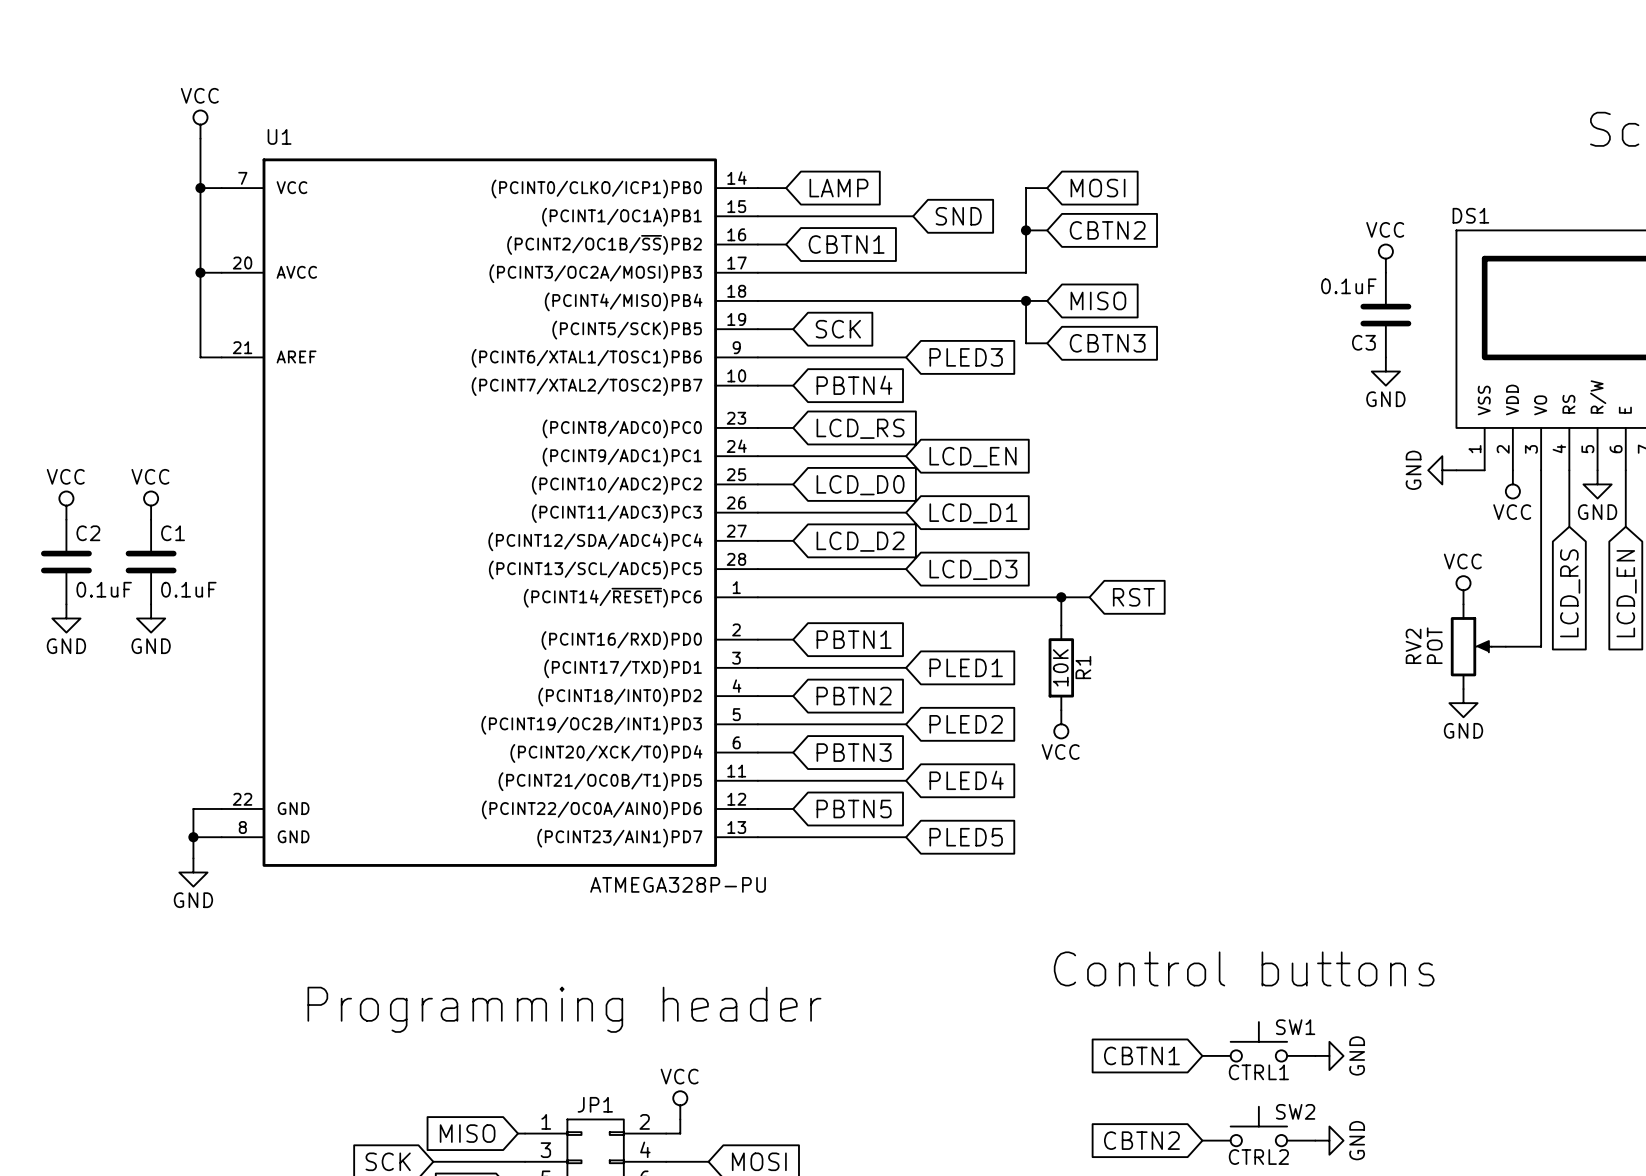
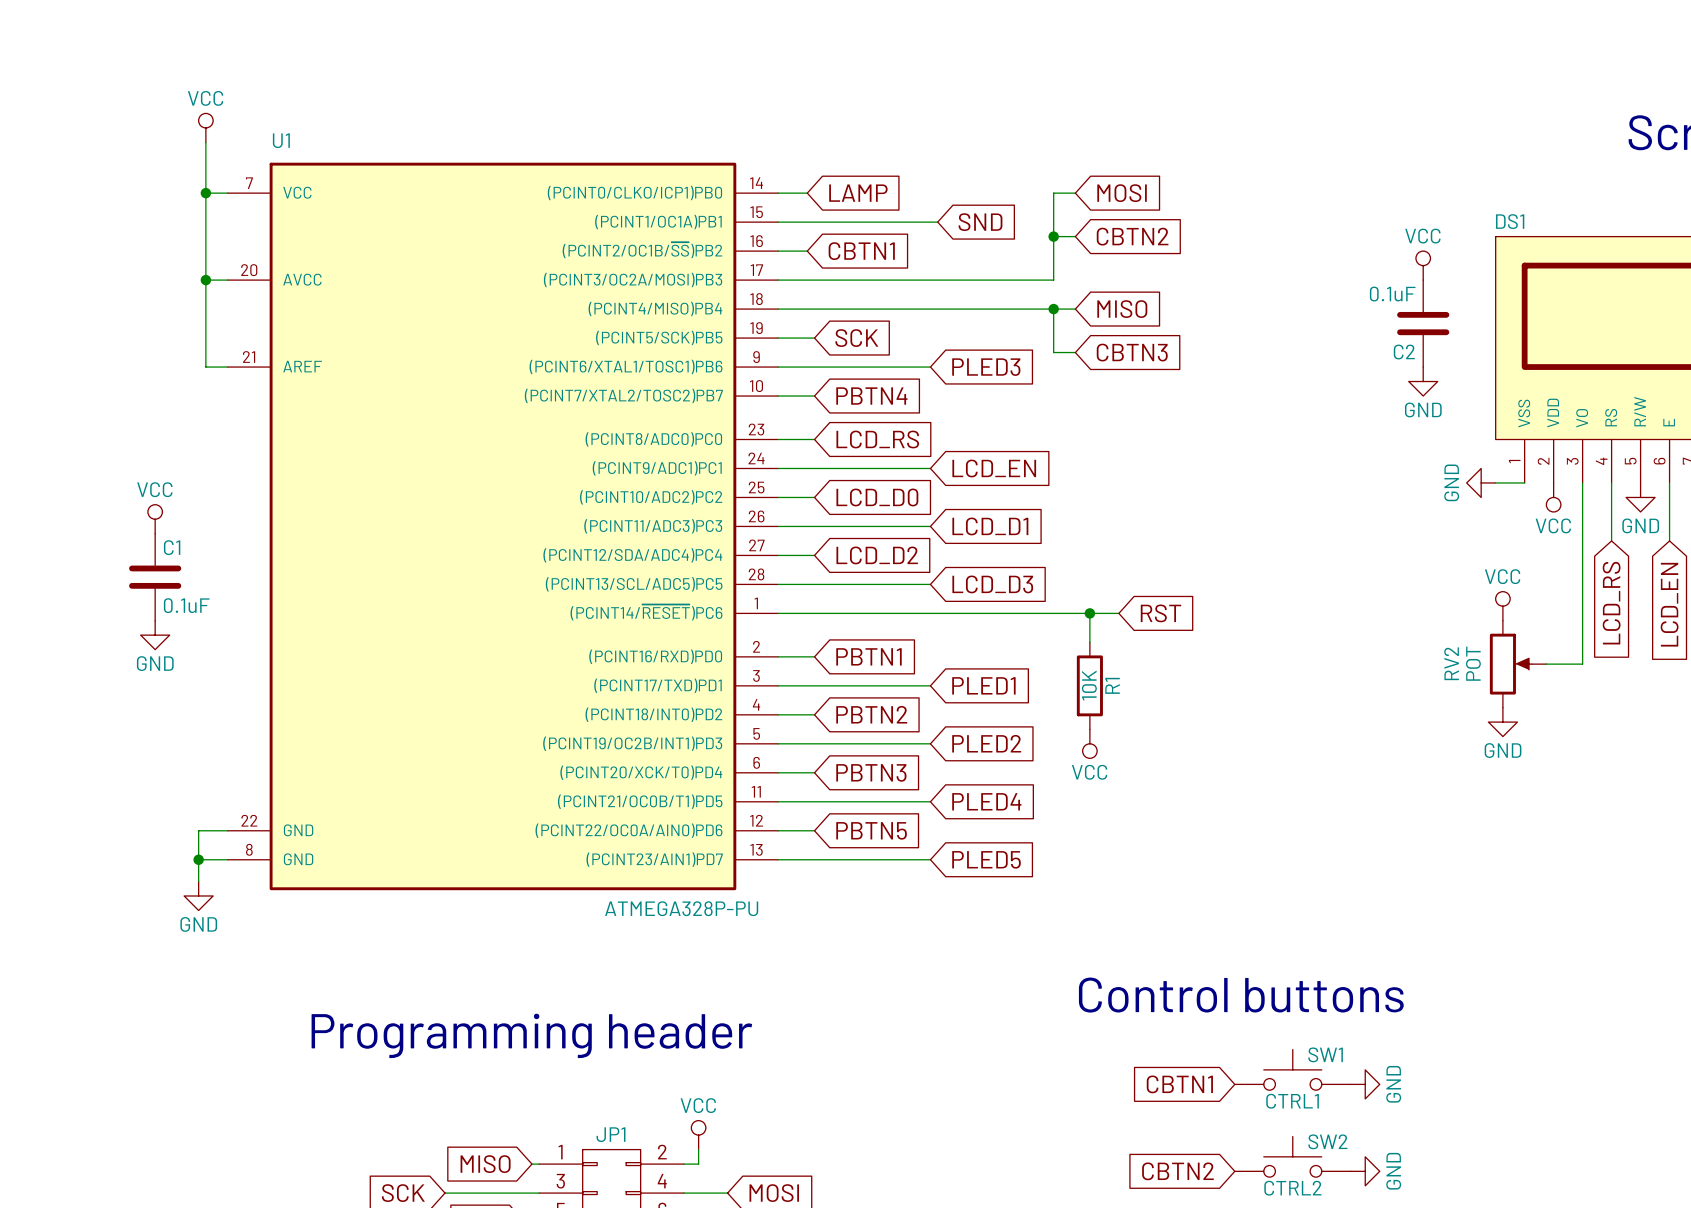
C3 name: C3 (1363, 342) -> C2 (1404, 352)
power symbol: VCC (66, 505) -> none
C2: 0.1uF (66, 562) -> none
power symbol: GND (66, 618) -> none

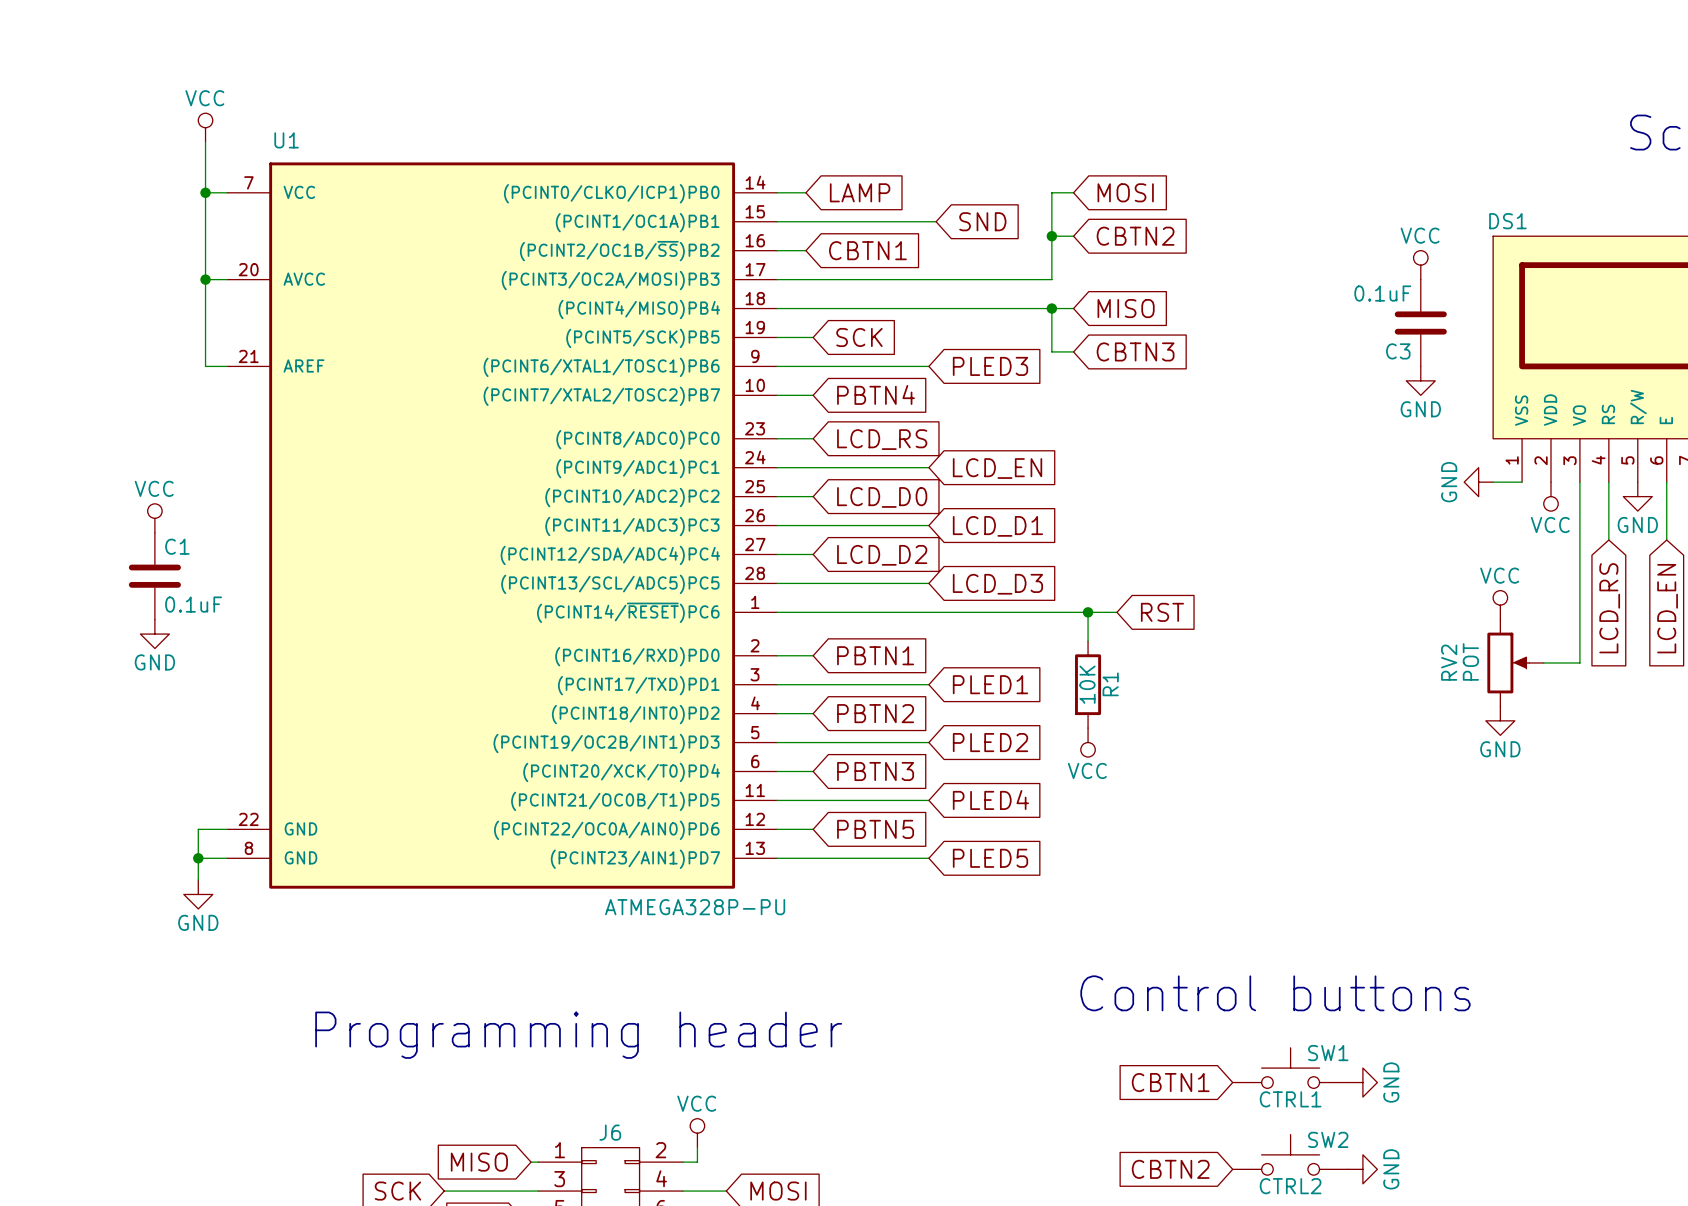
C2 name: C2 (1404, 352) -> C3 (1398, 351)
JP1 name: JP1 (611, 1134) -> J6 (610, 1132)

